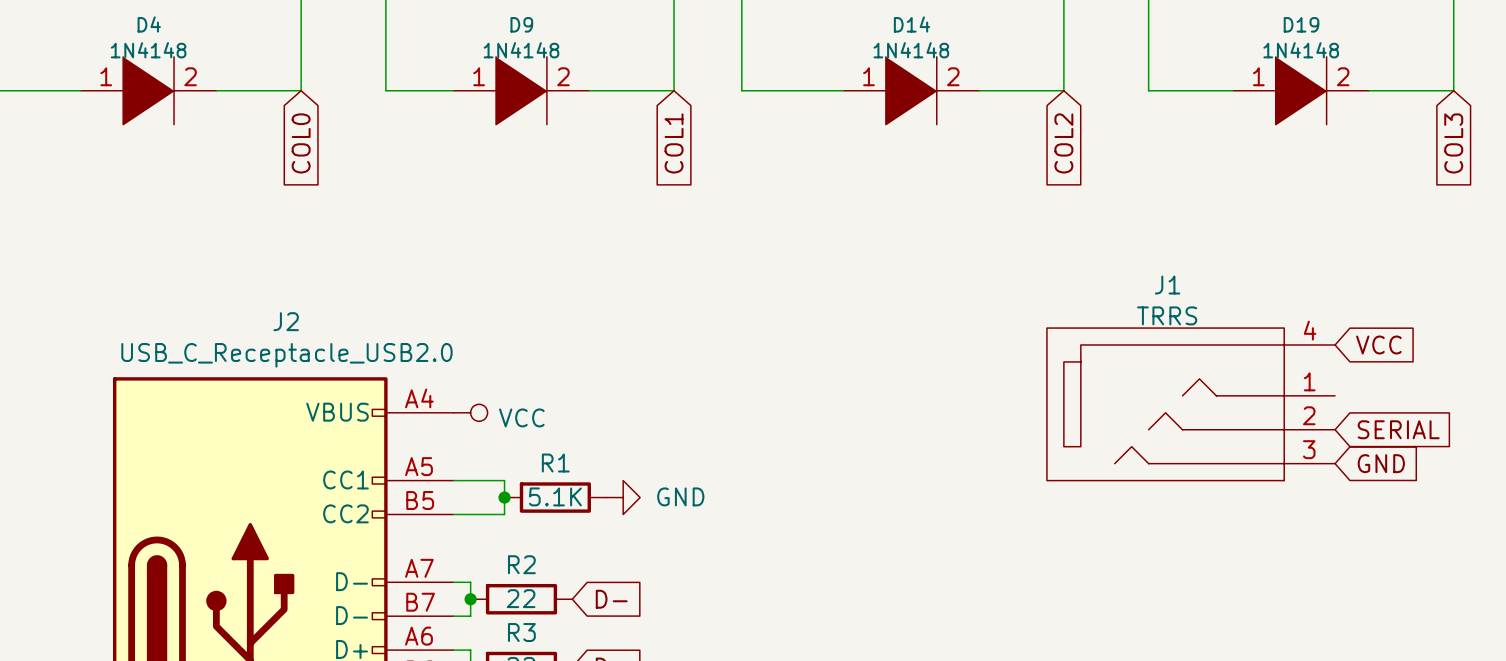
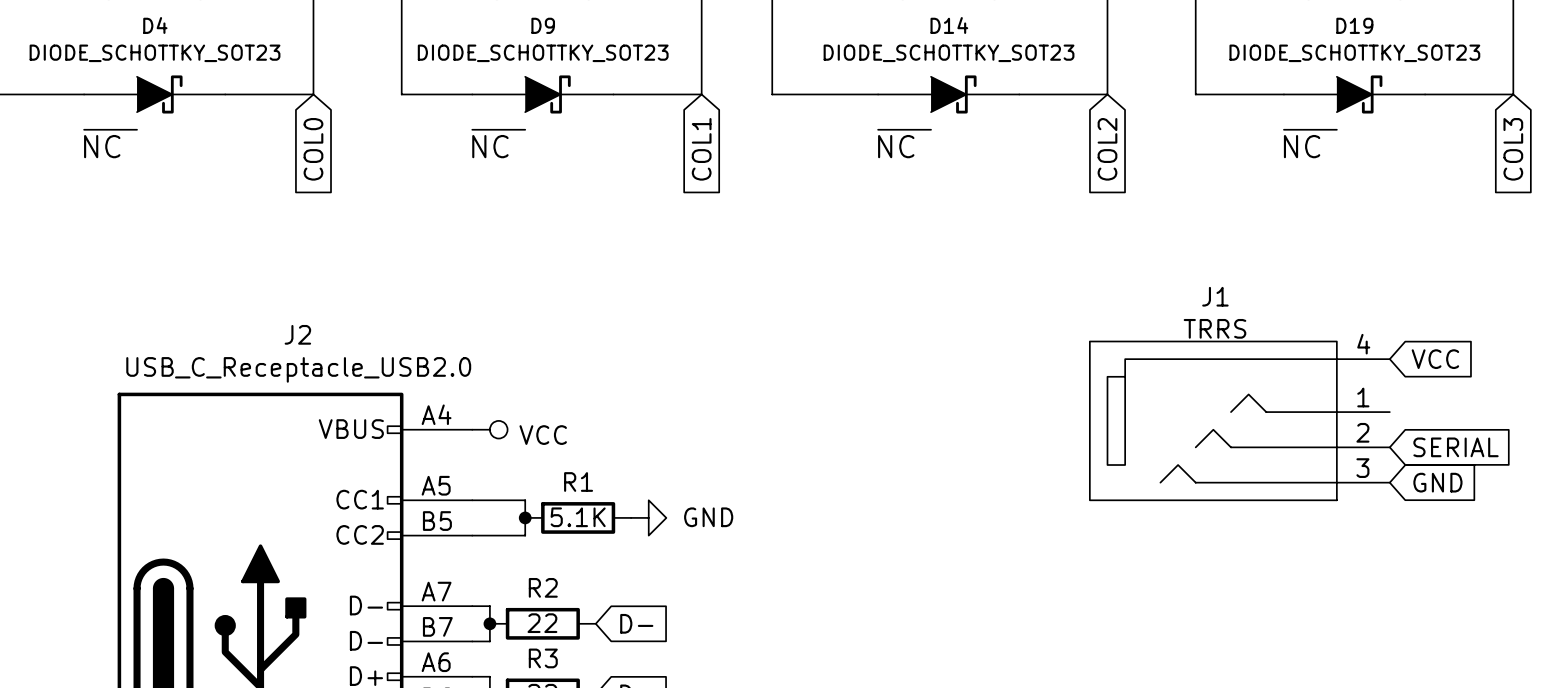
D4 value: 1N4148 (148, 50) -> DIODE_SCHOTTKY_SOT23 (155, 53)
D9 value: 1N4148 (521, 50) -> DIODE_SCHOTTKY_SOT23 (543, 53)
D14 value: 1N4148 (911, 50) -> DIODE_SCHOTTKY_SOT23 (949, 53)
D19 value: 1N4148 (1301, 50) -> DIODE_SCHOTTKY_SOT23 (1354, 53)
D4 symbol: [80, 56, 217, 125] -> [84, 75, 226, 130]
D9 symbol: [453, 56, 590, 125] -> [472, 75, 614, 130]
D14 symbol: [843, 56, 980, 125] -> [878, 75, 1020, 130]
D19 symbol: [1233, 56, 1369, 125] -> [1283, 75, 1426, 130]

